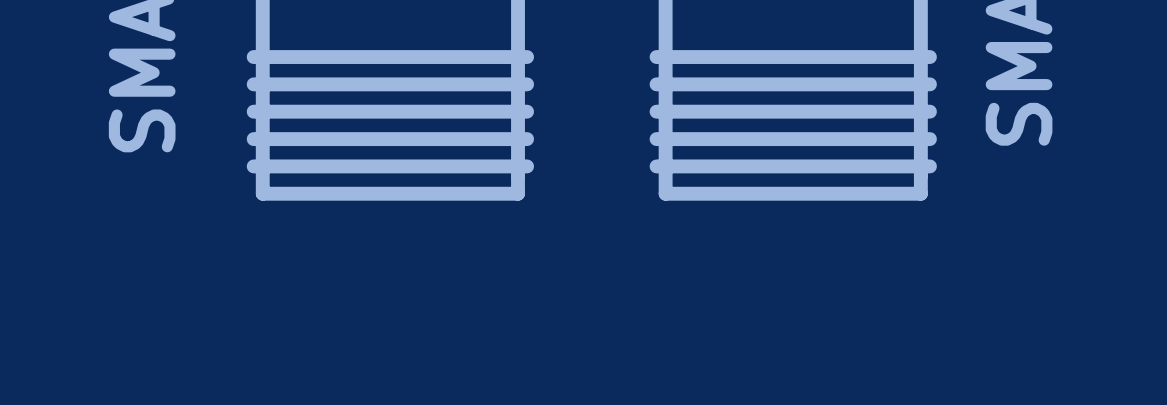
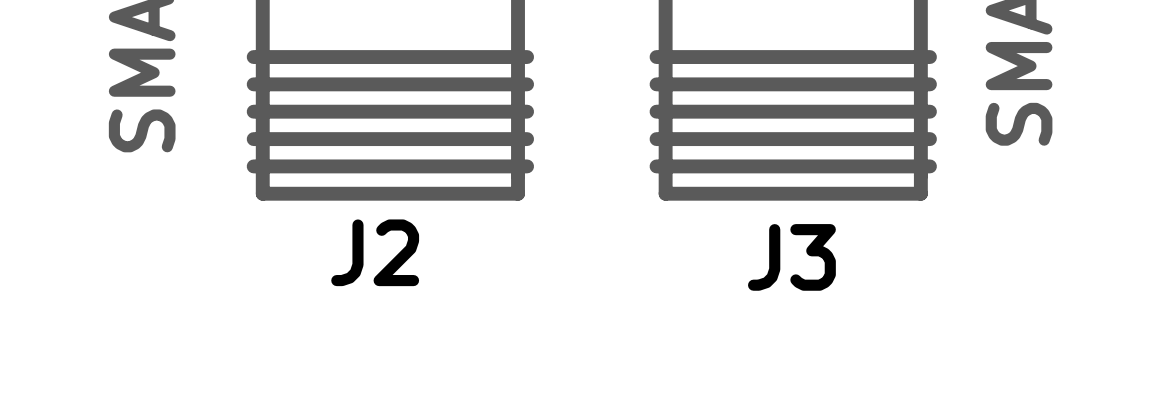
J2 name: none -> J2 (375, 252)
J3 name: none -> J3 (791, 257)

